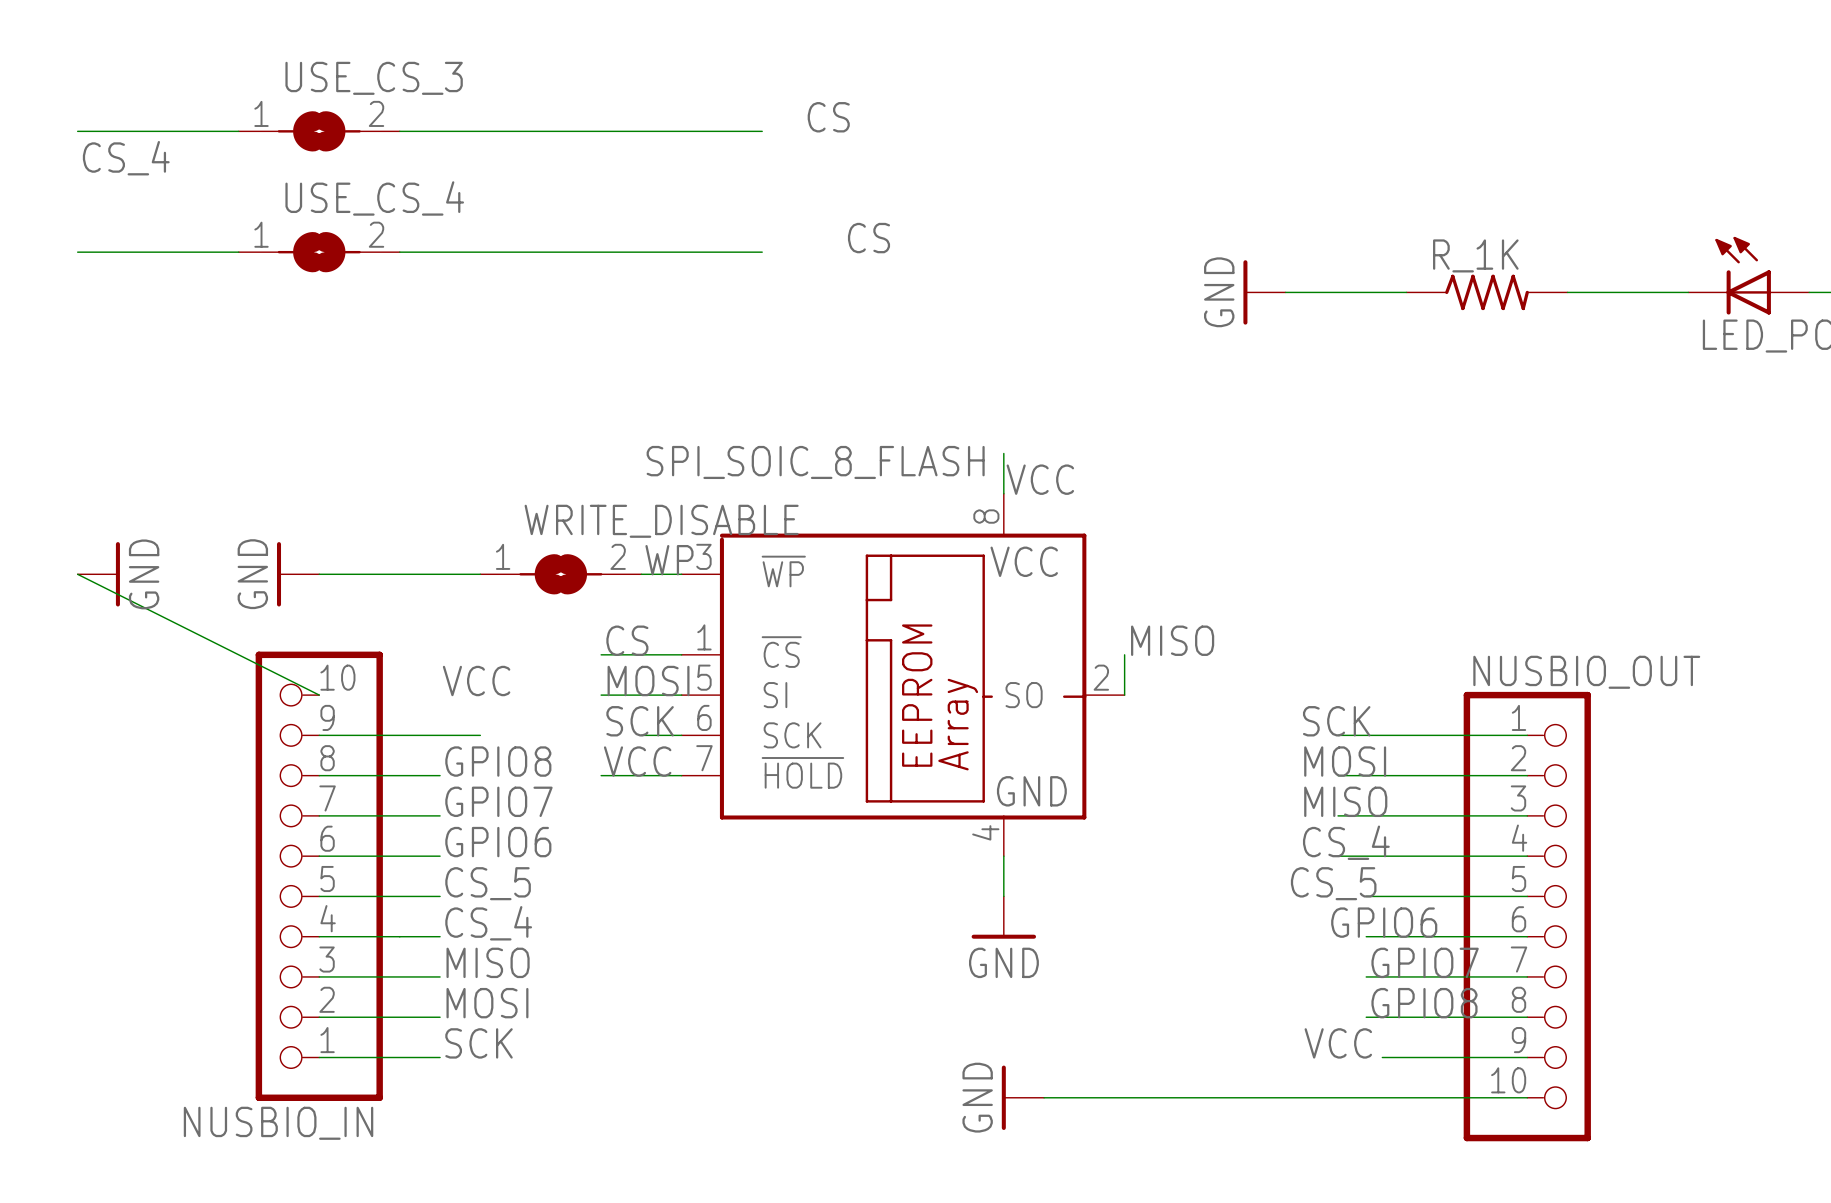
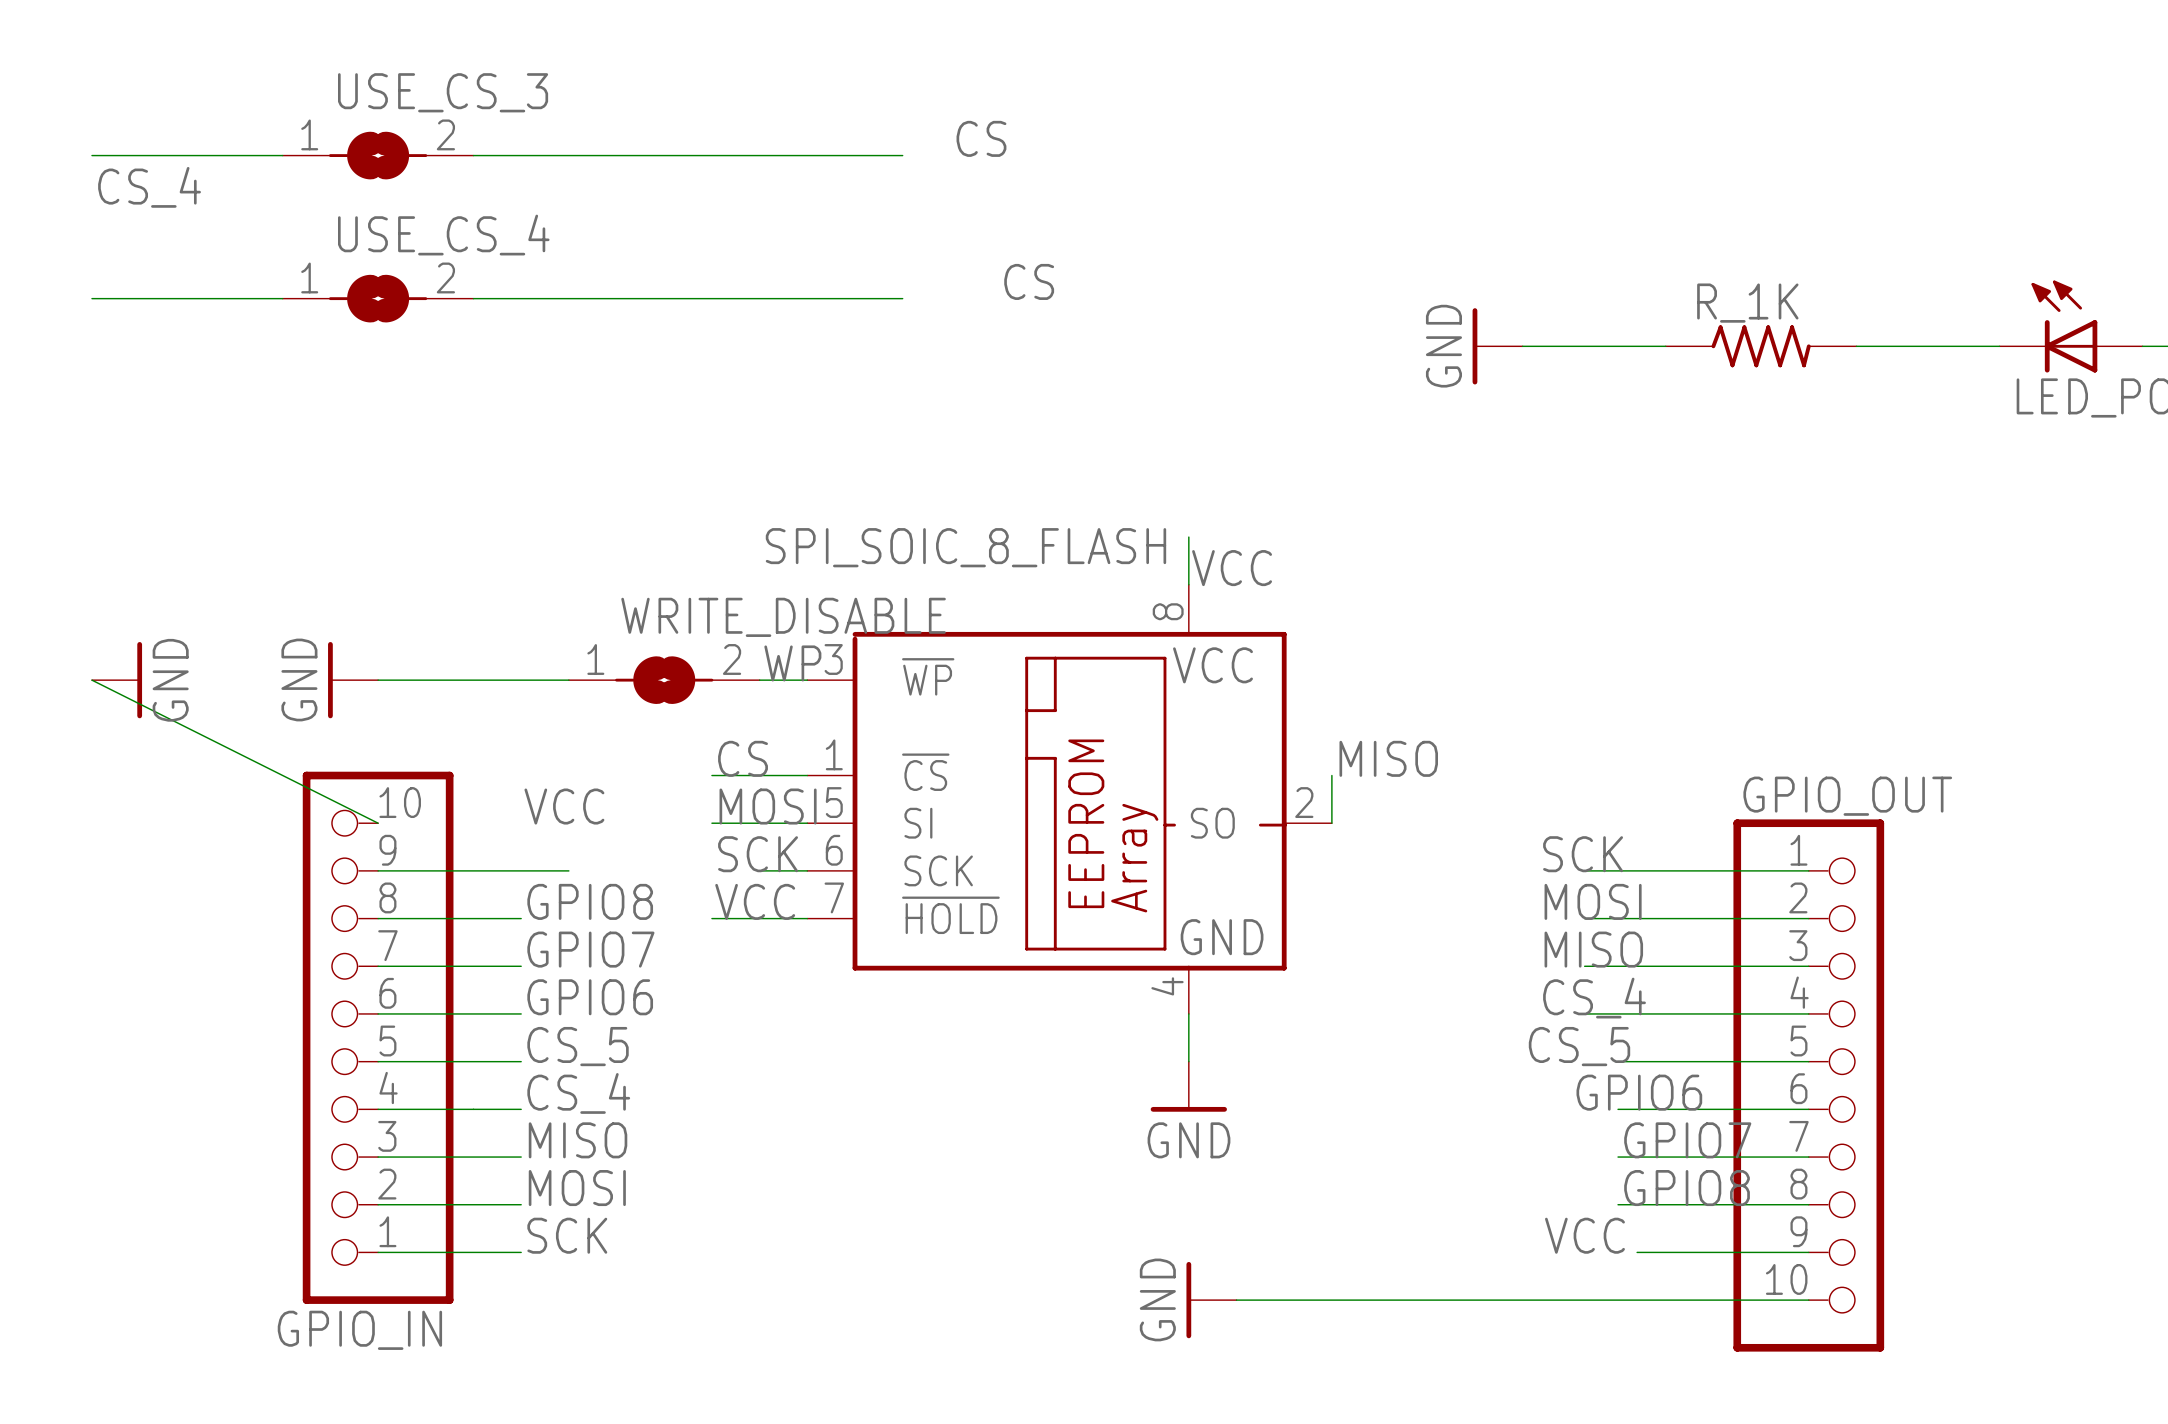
NUSBIO_OUT name: NUSBIO_OUT (1586, 672) -> GPIO_OUT (1847, 796)
NUSBIO_IN name: NUSBIO_IN (278, 1123) -> GPIO_IN (359, 1330)

